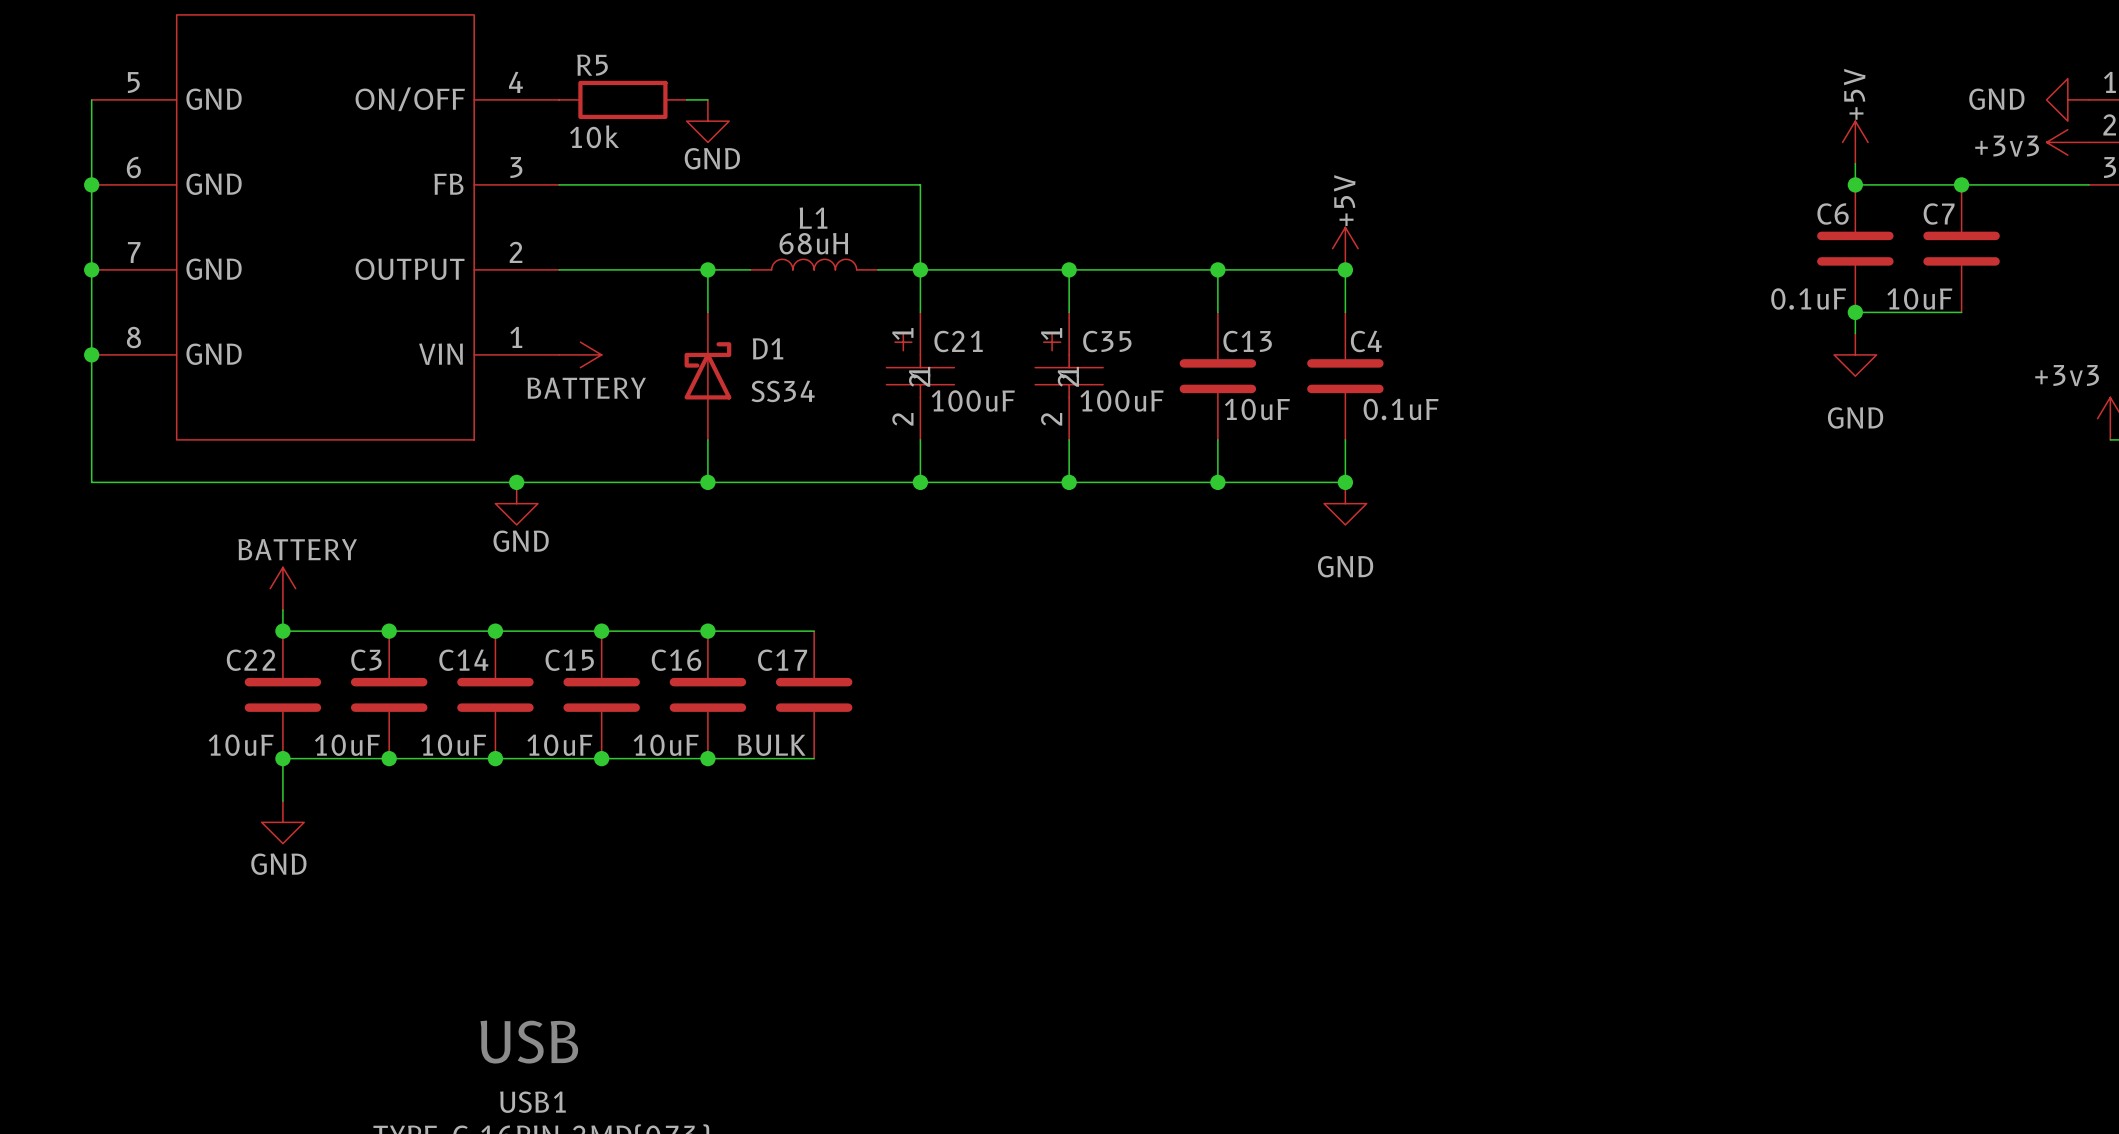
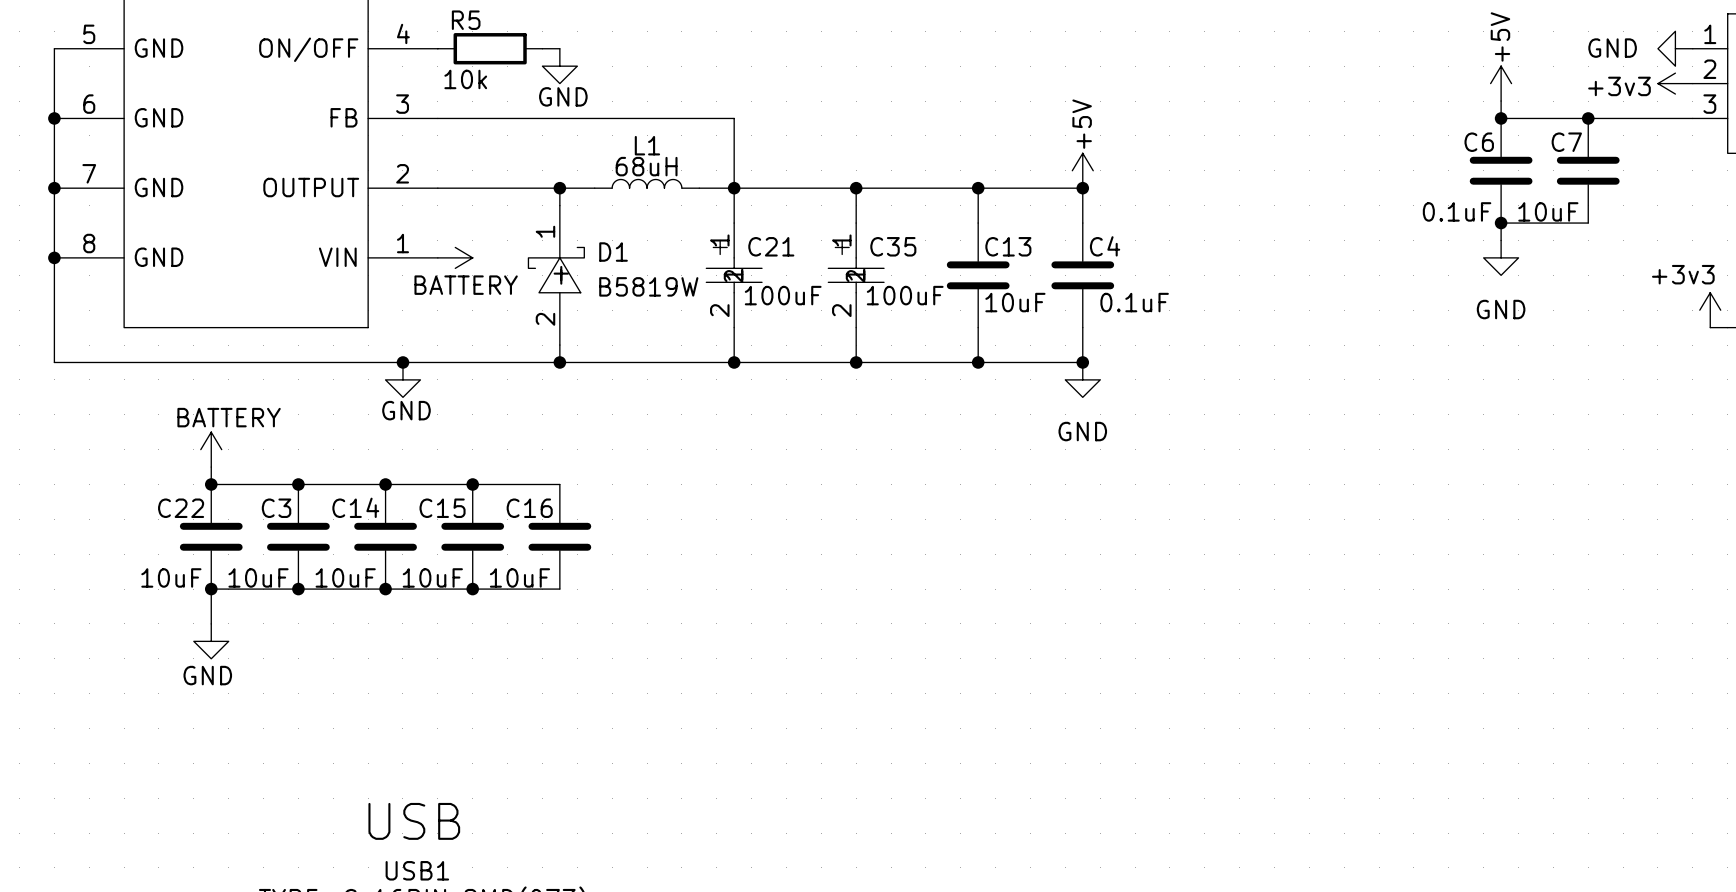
D1 symbol: [684, 312, 732, 440] -> [528, 205, 585, 346]
D1 value: SS34 (783, 391) -> B5819W (648, 286)
wire: (707, 631) (814, 631) -> none
junction: (707, 631) -> none
C17: BULK (814, 694) -> none
wire: (707, 758) (814, 758) -> none
junction: (707, 758) -> none

